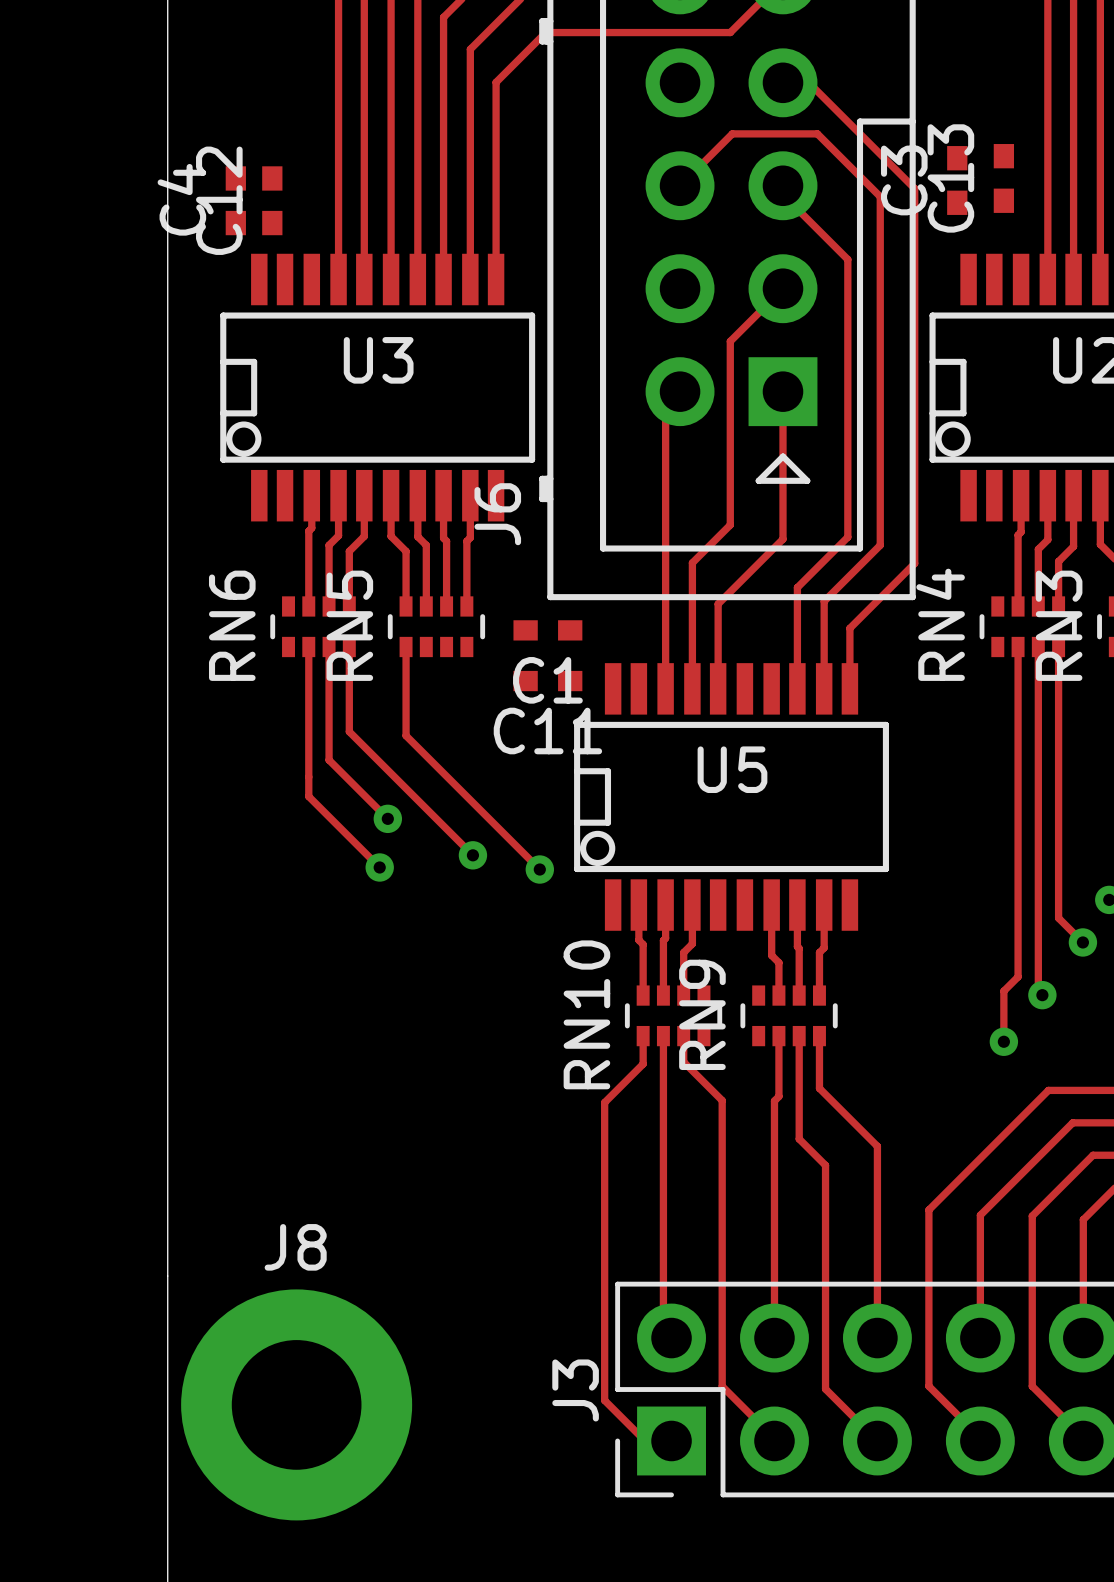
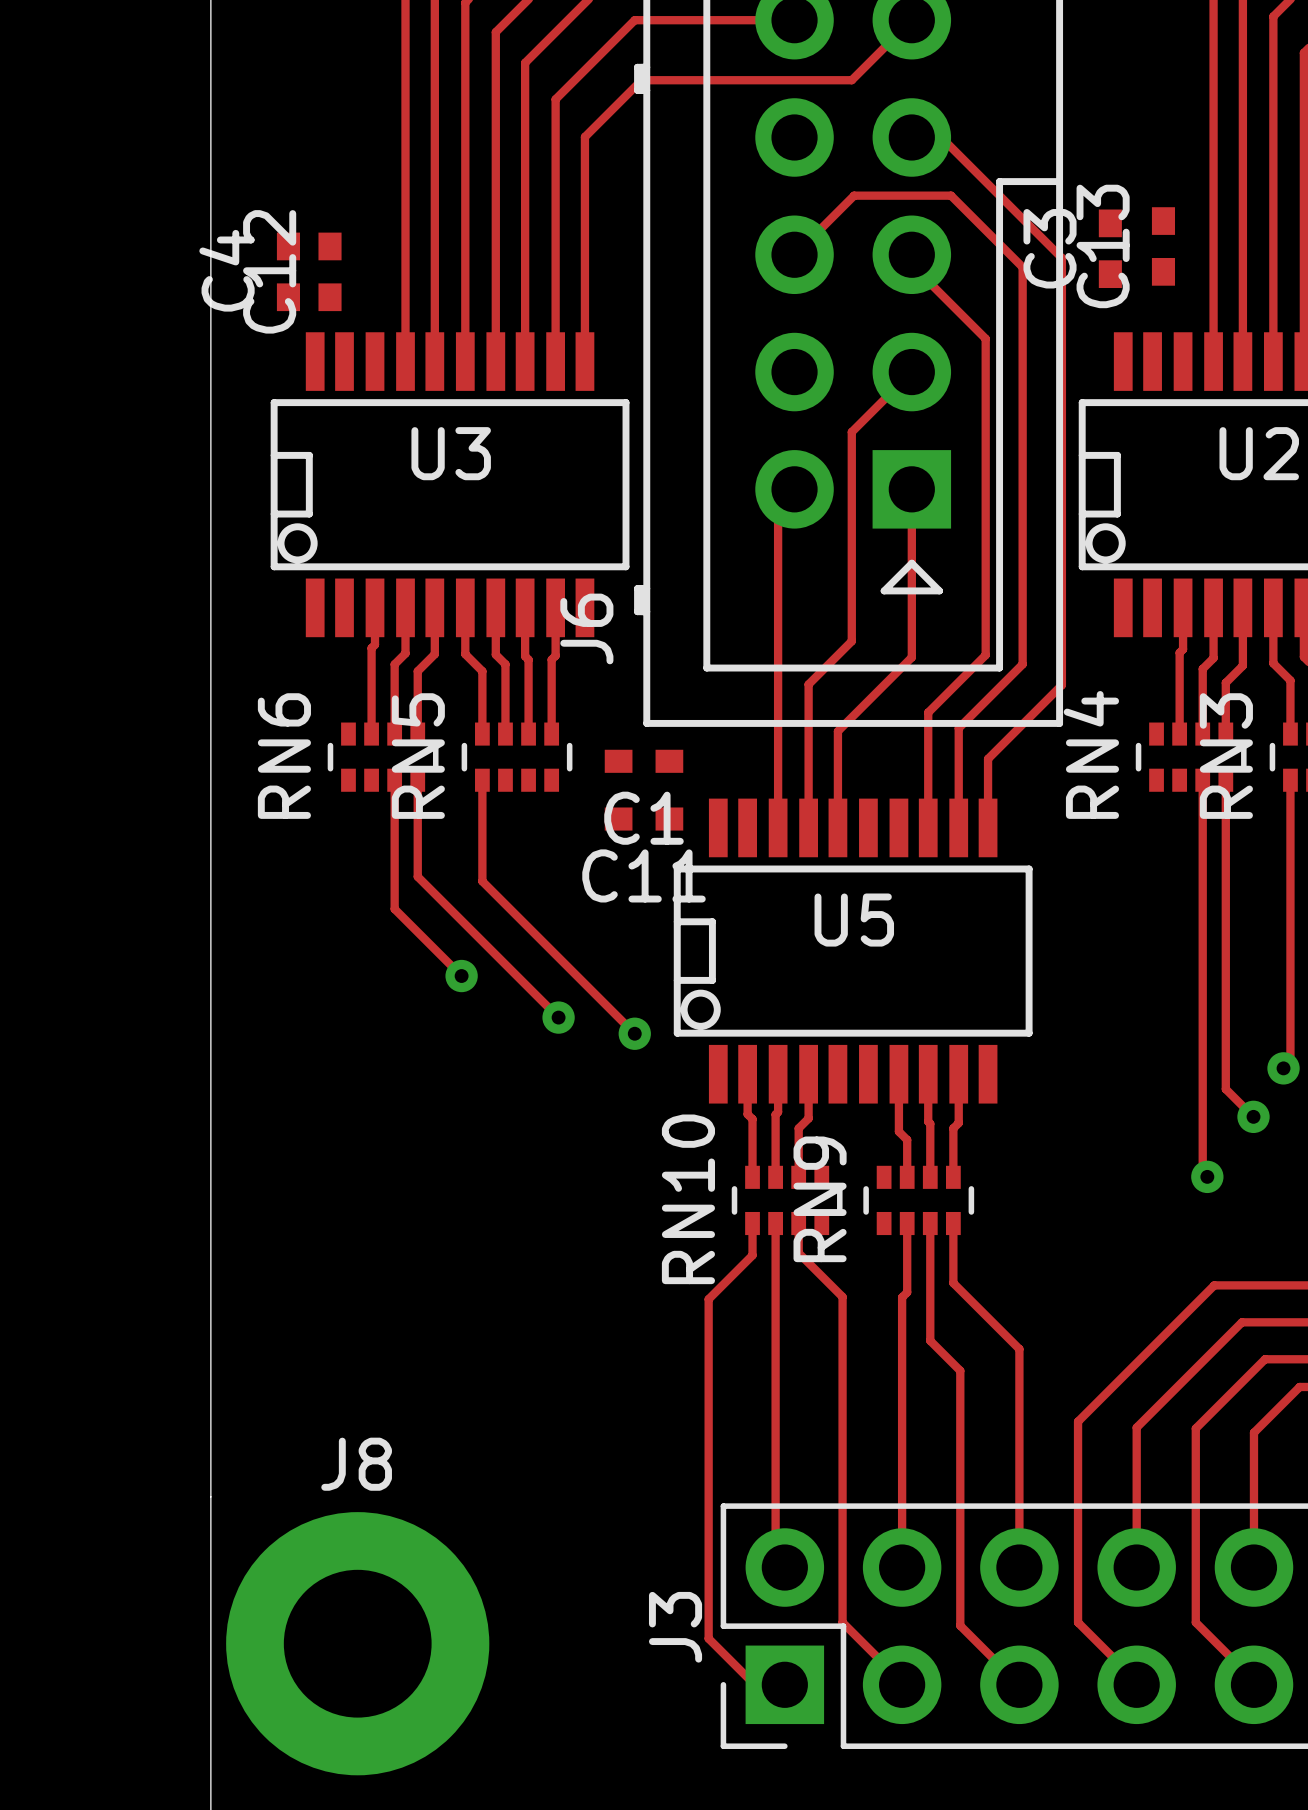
track: (308, 647) (308, 796) (379, 867) -> none
track: (1018, 647) (1018, 976) (1003, 991) (1003, 1041) -> none
via: (379, 867) -> none
via: (1003, 1041) -> none

